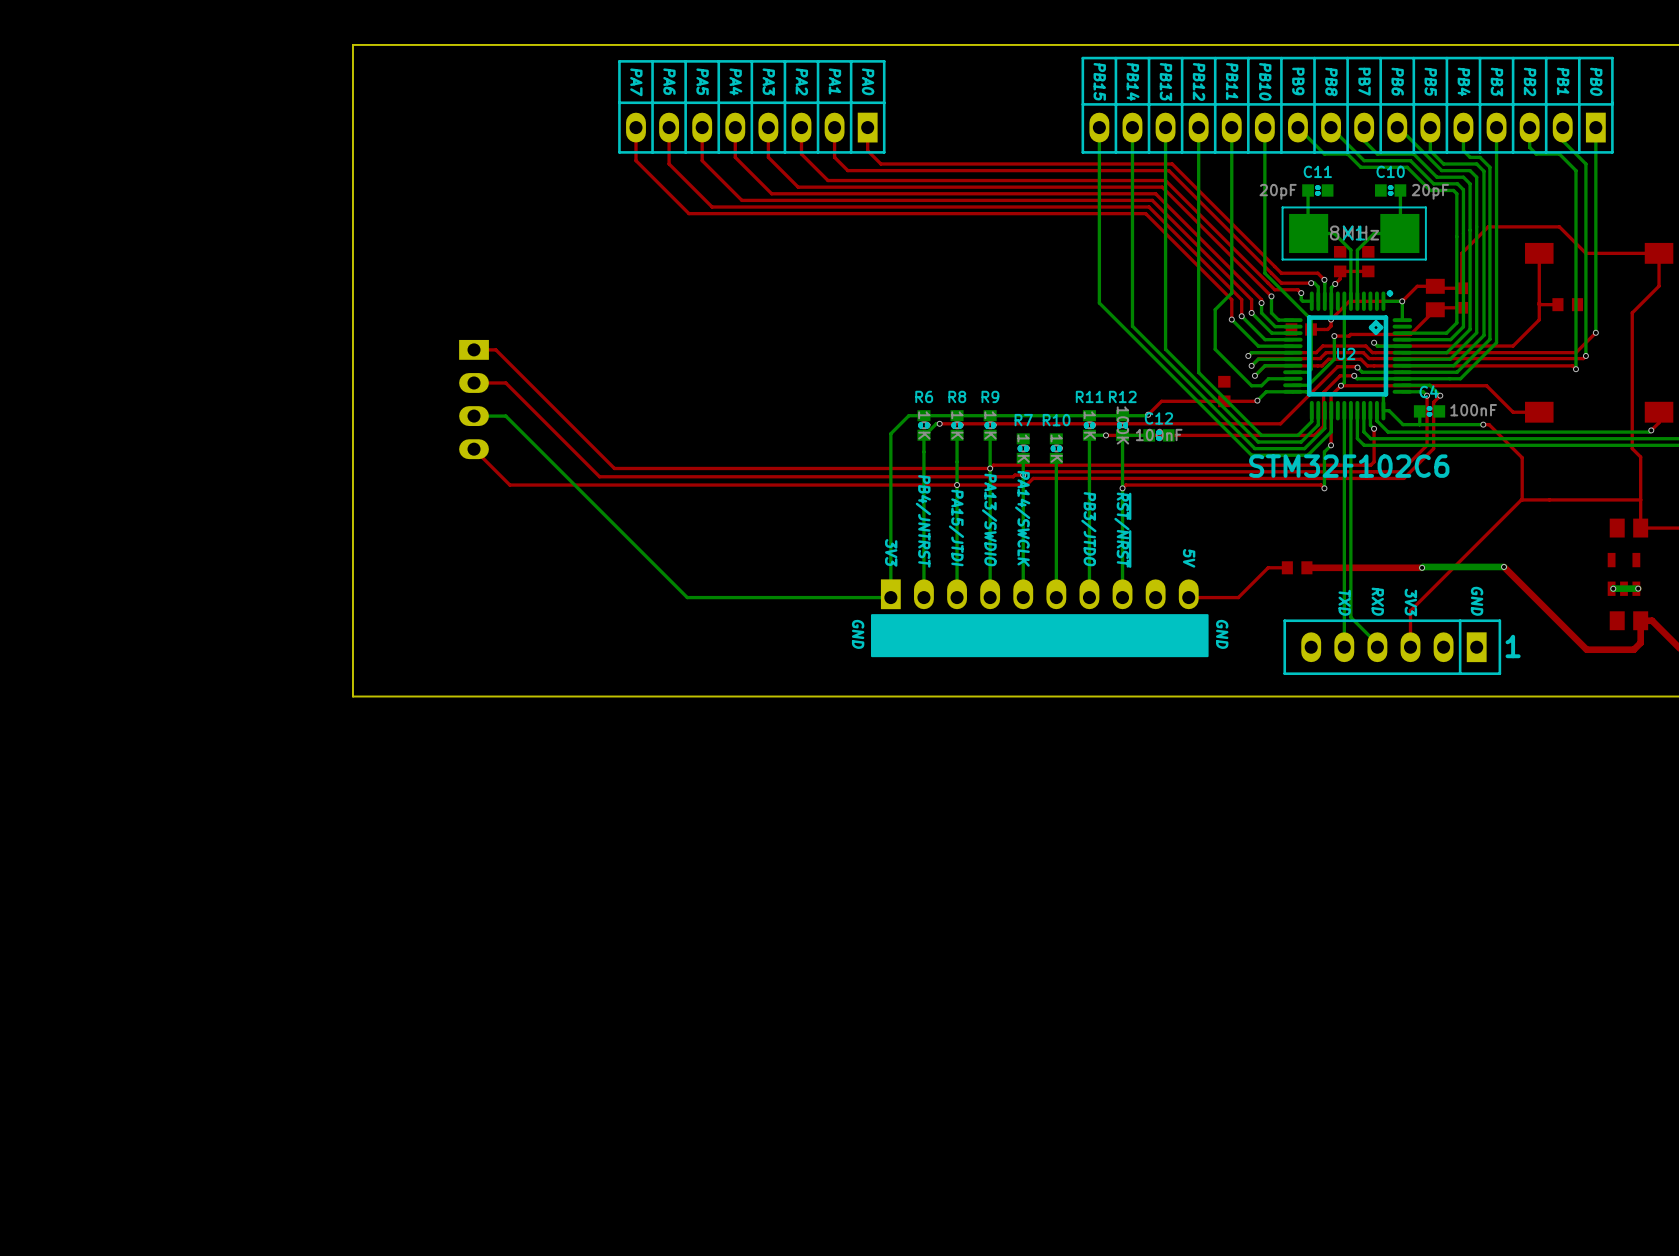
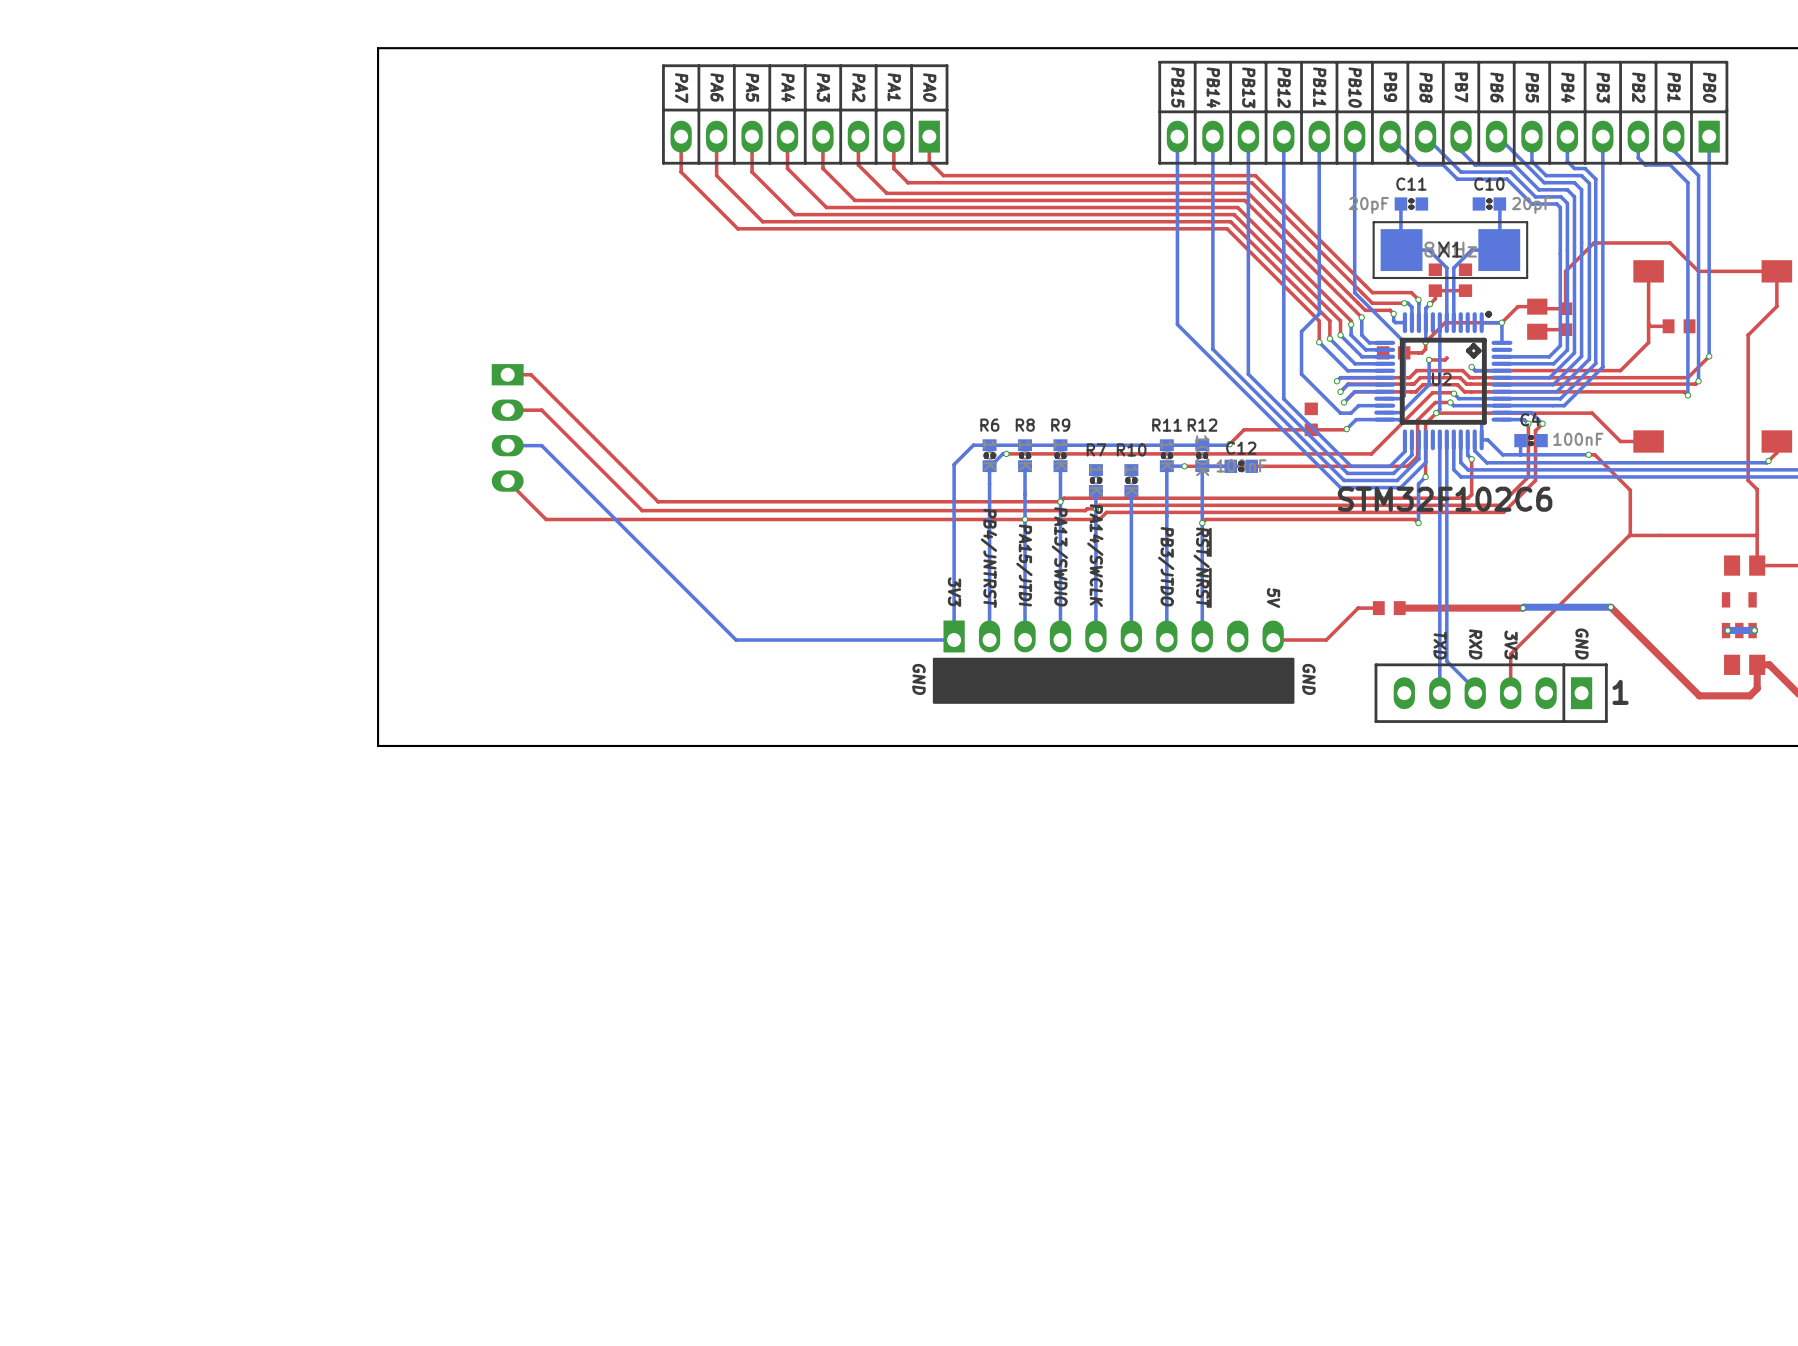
top track: (1435, 309) (1410, 334) (1350, 334) -> none

